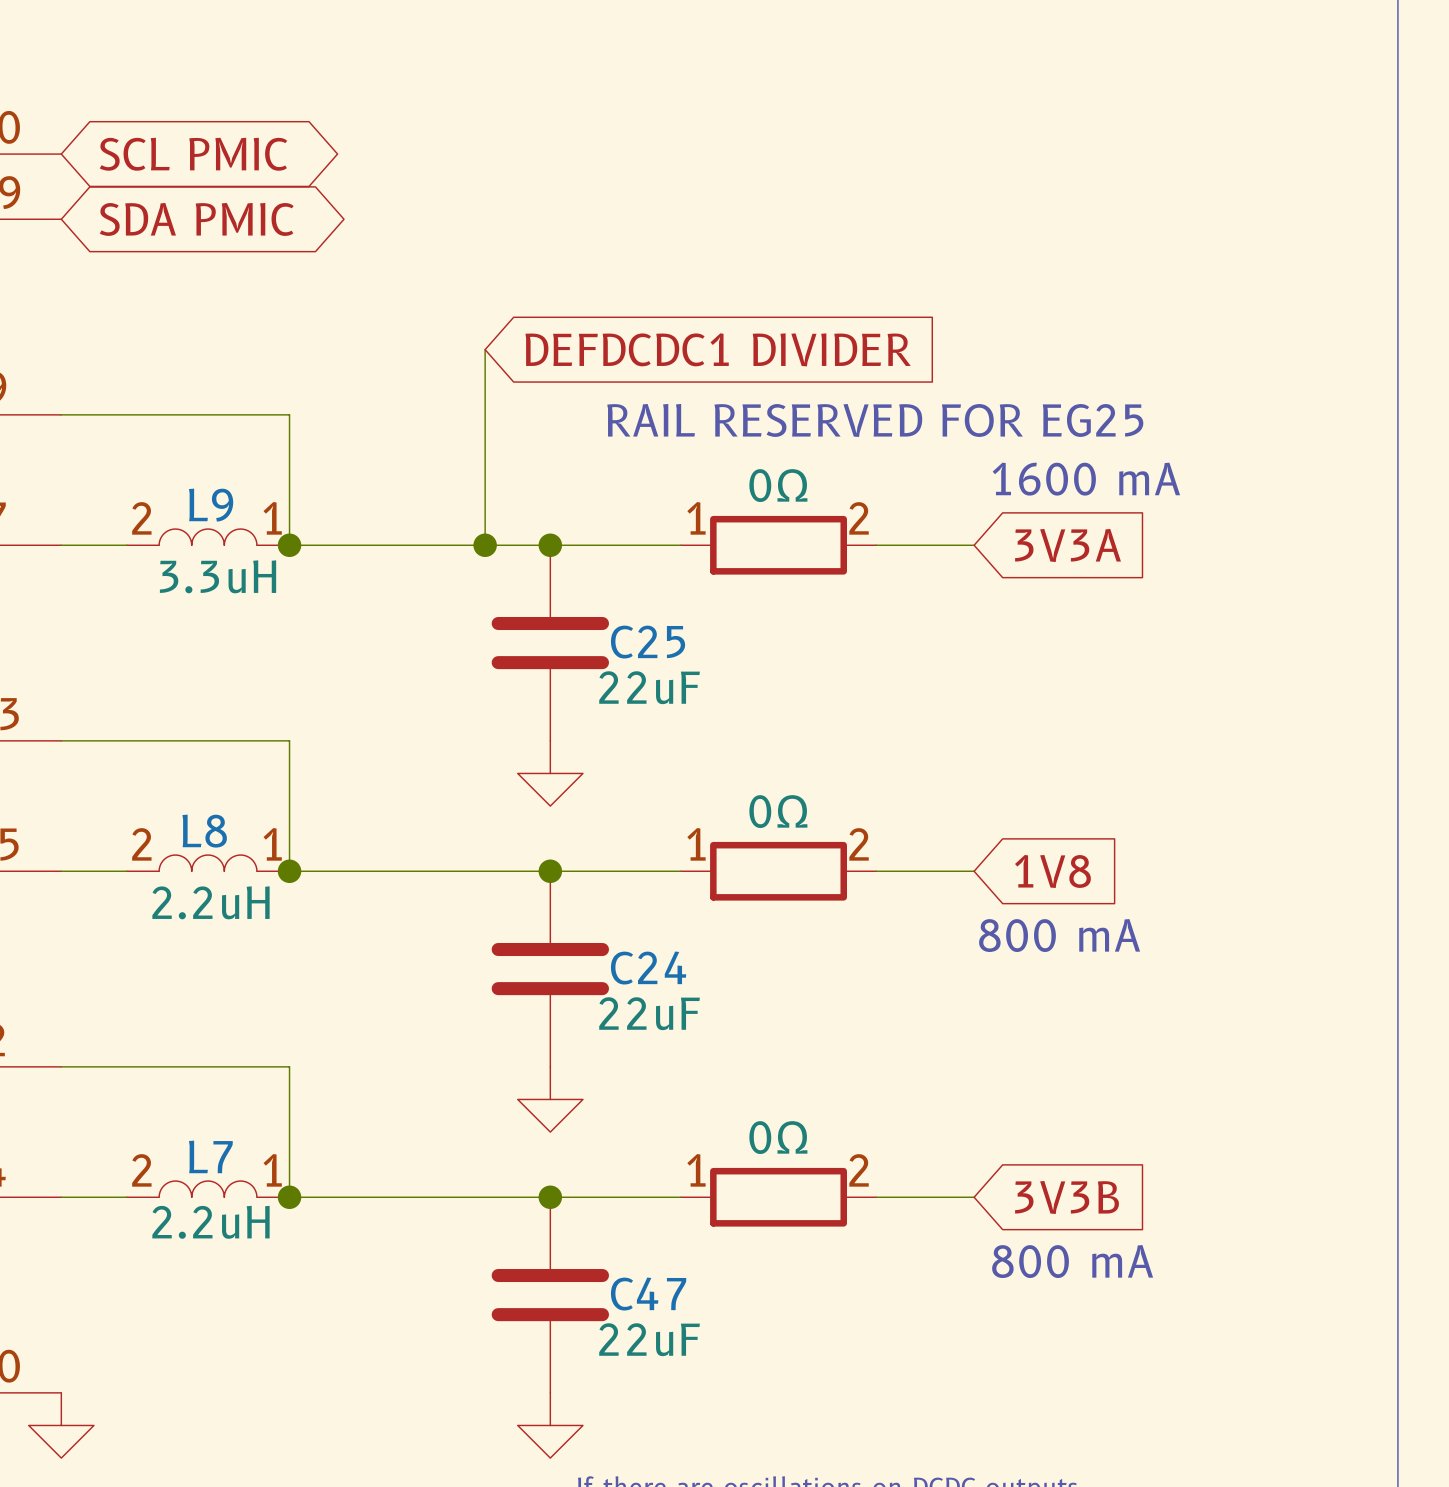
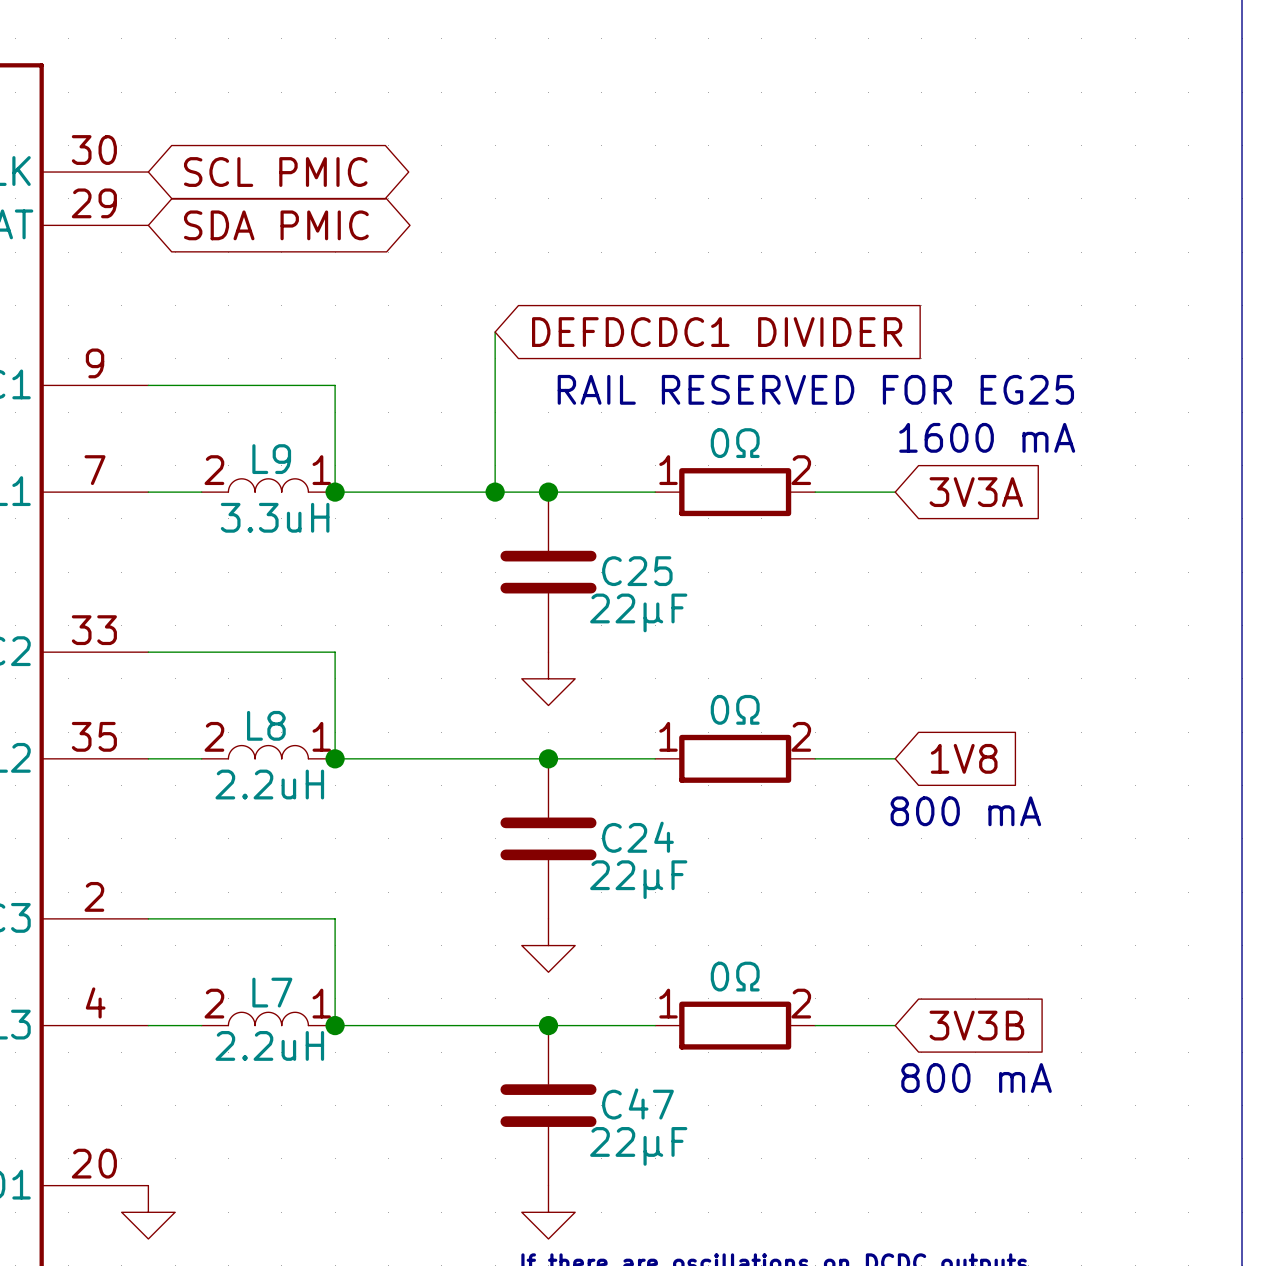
C25 value: 22uF (649, 687) -> 22μF (638, 612)
C24 value: 22uF (649, 1013) -> 22μF (638, 879)
C47 value: 22uF (649, 1339) -> 22μF (638, 1146)

